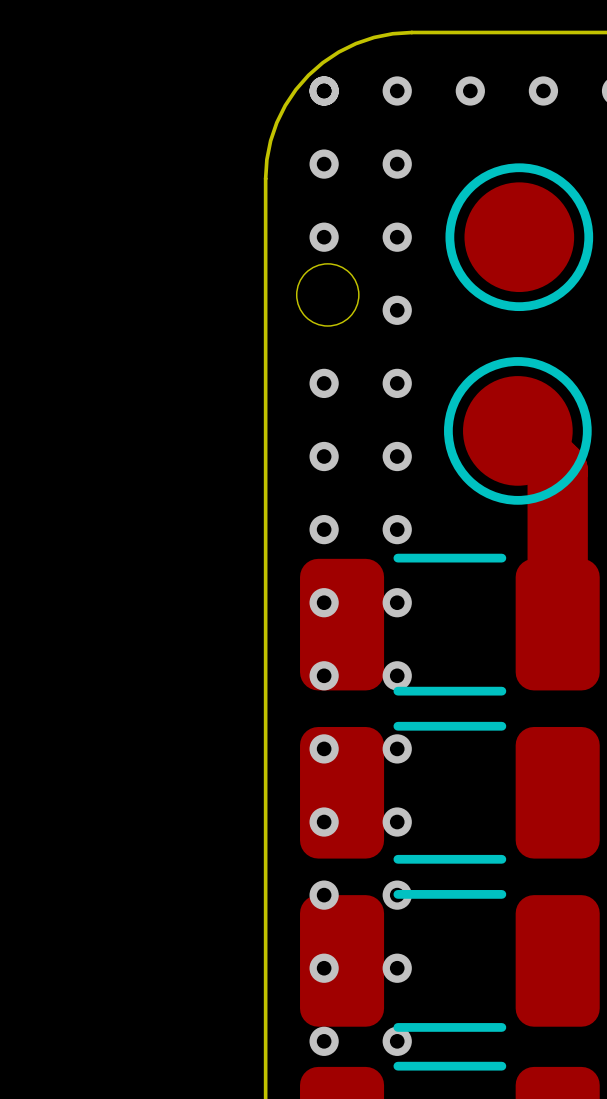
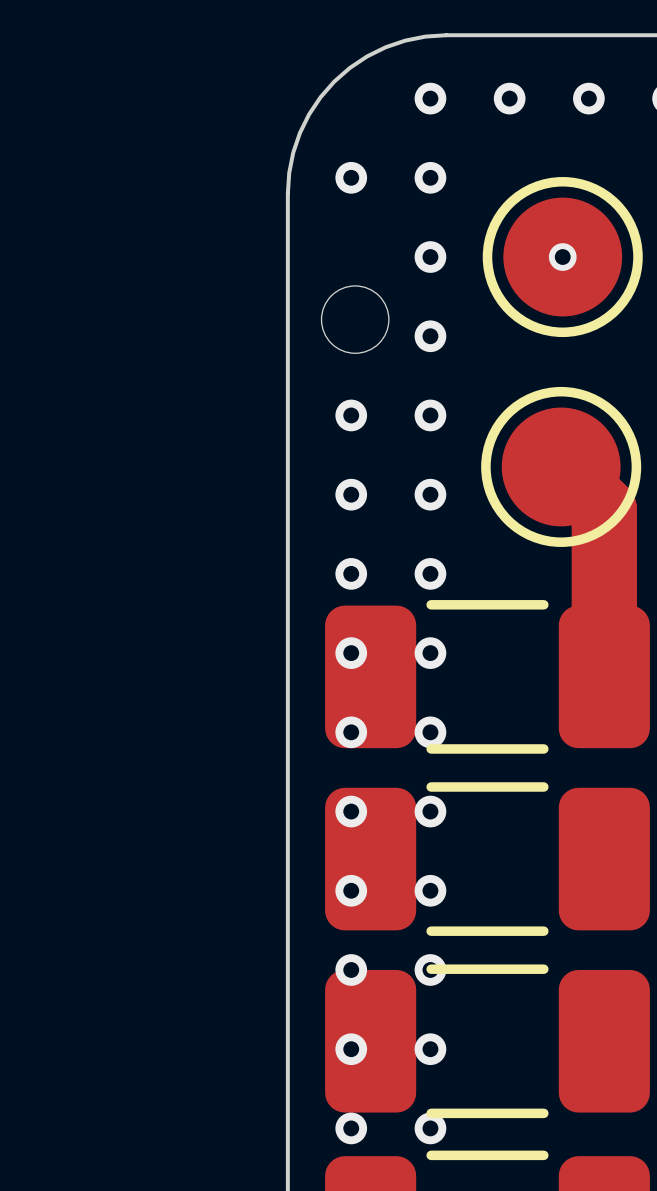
via: (324, 90) -> none
via: (324, 237) -> none
via: none -> (562, 257)

